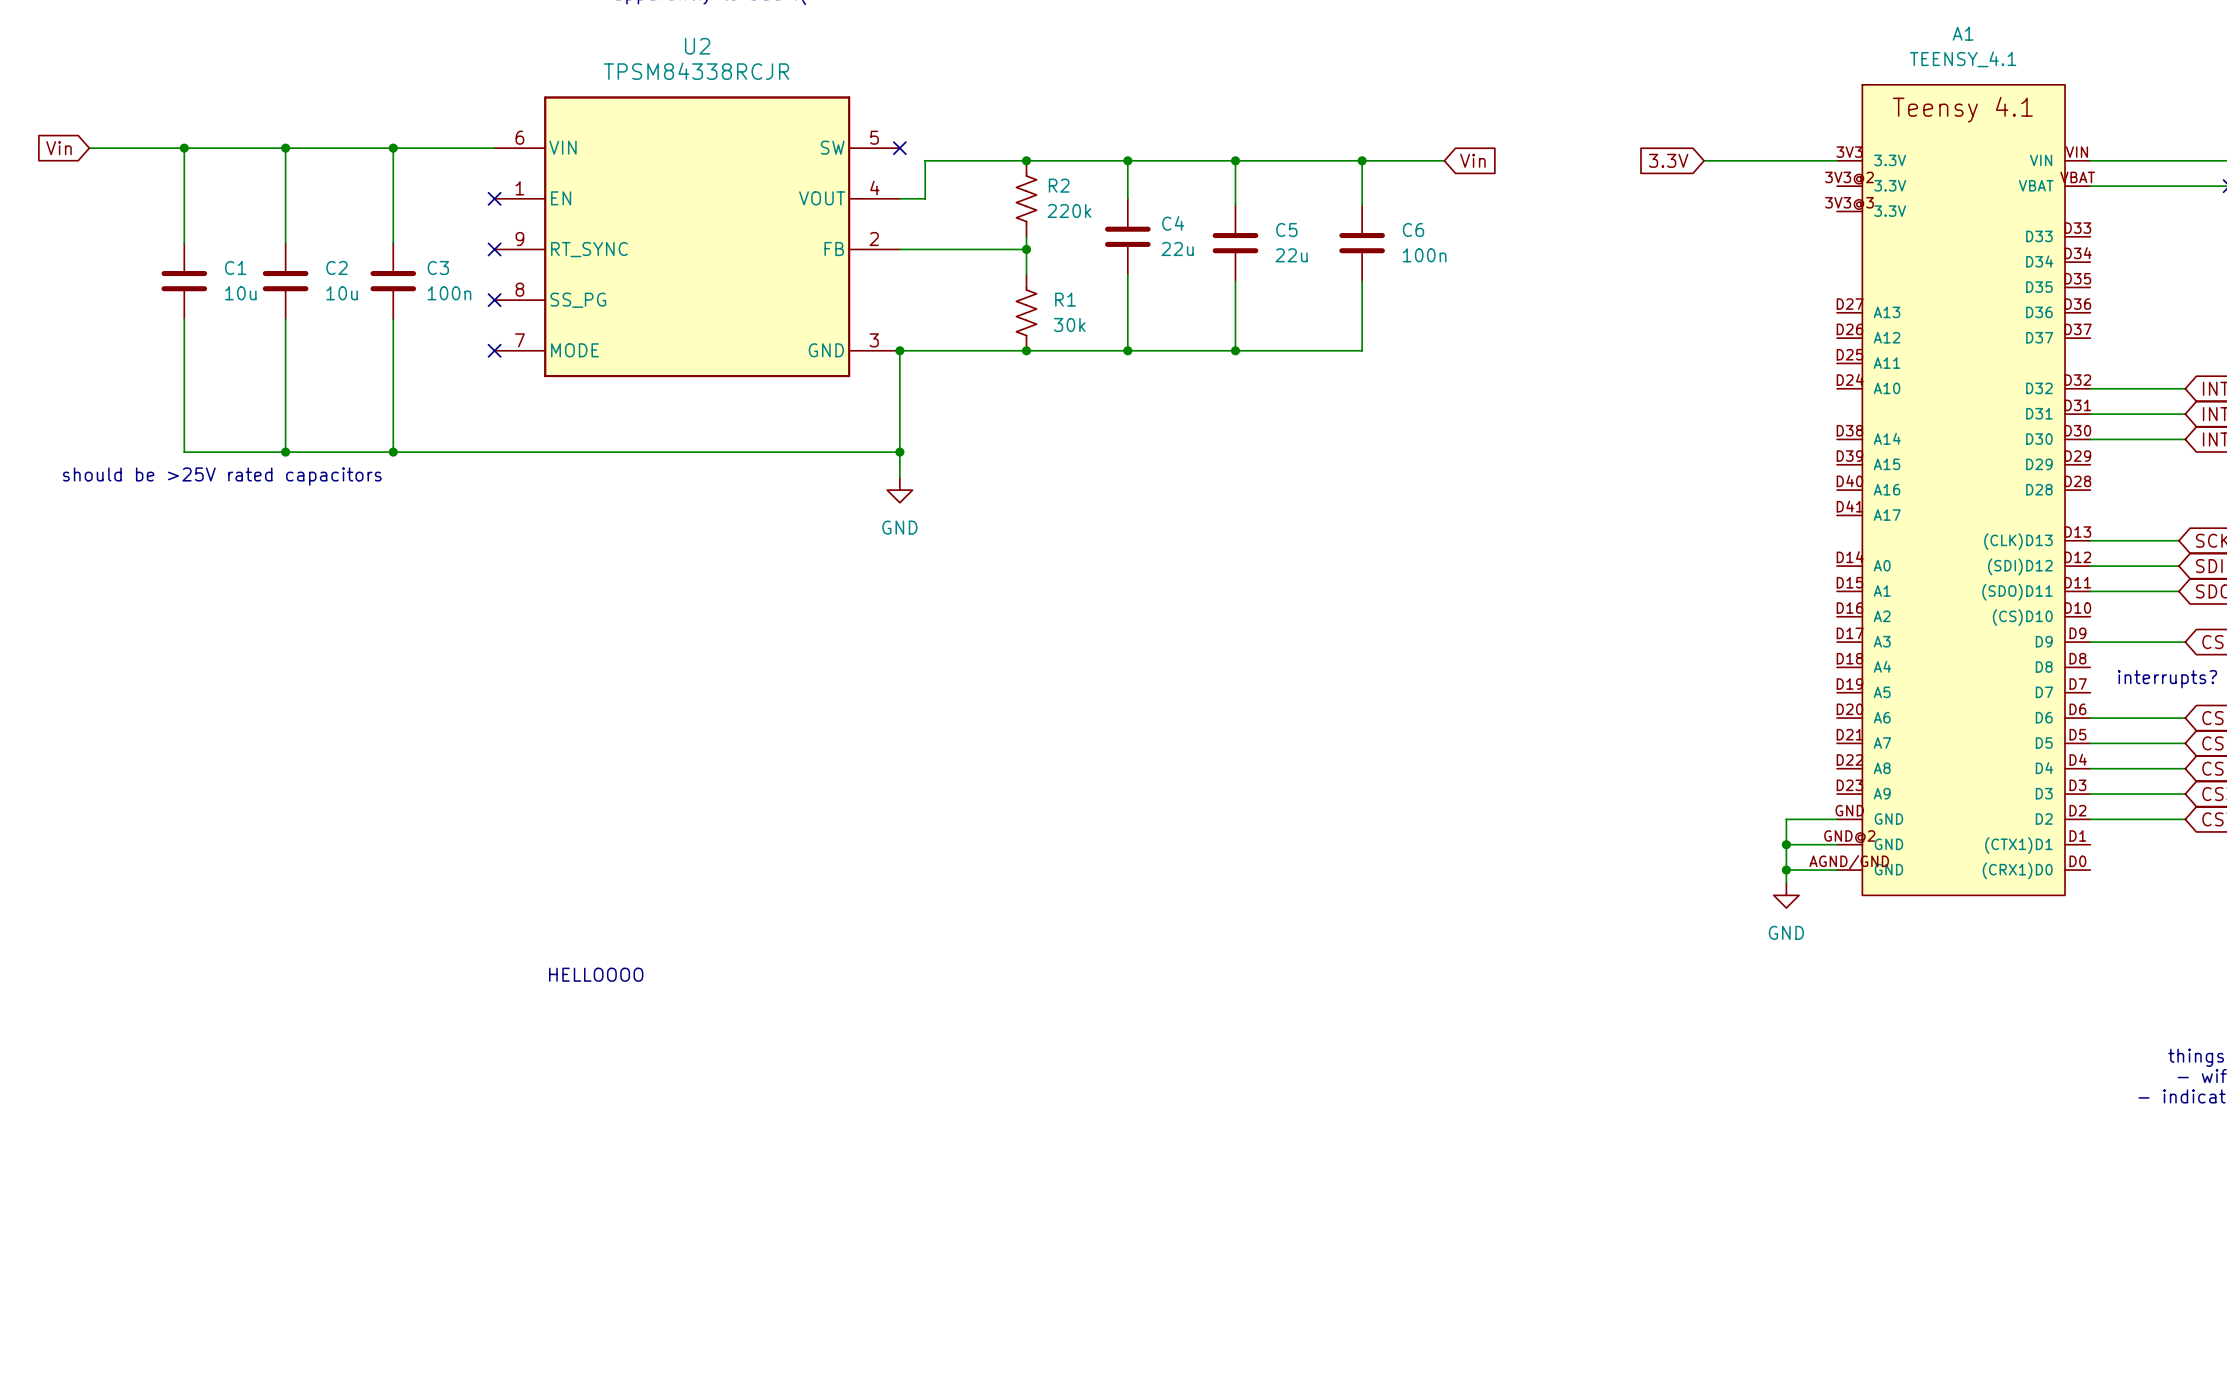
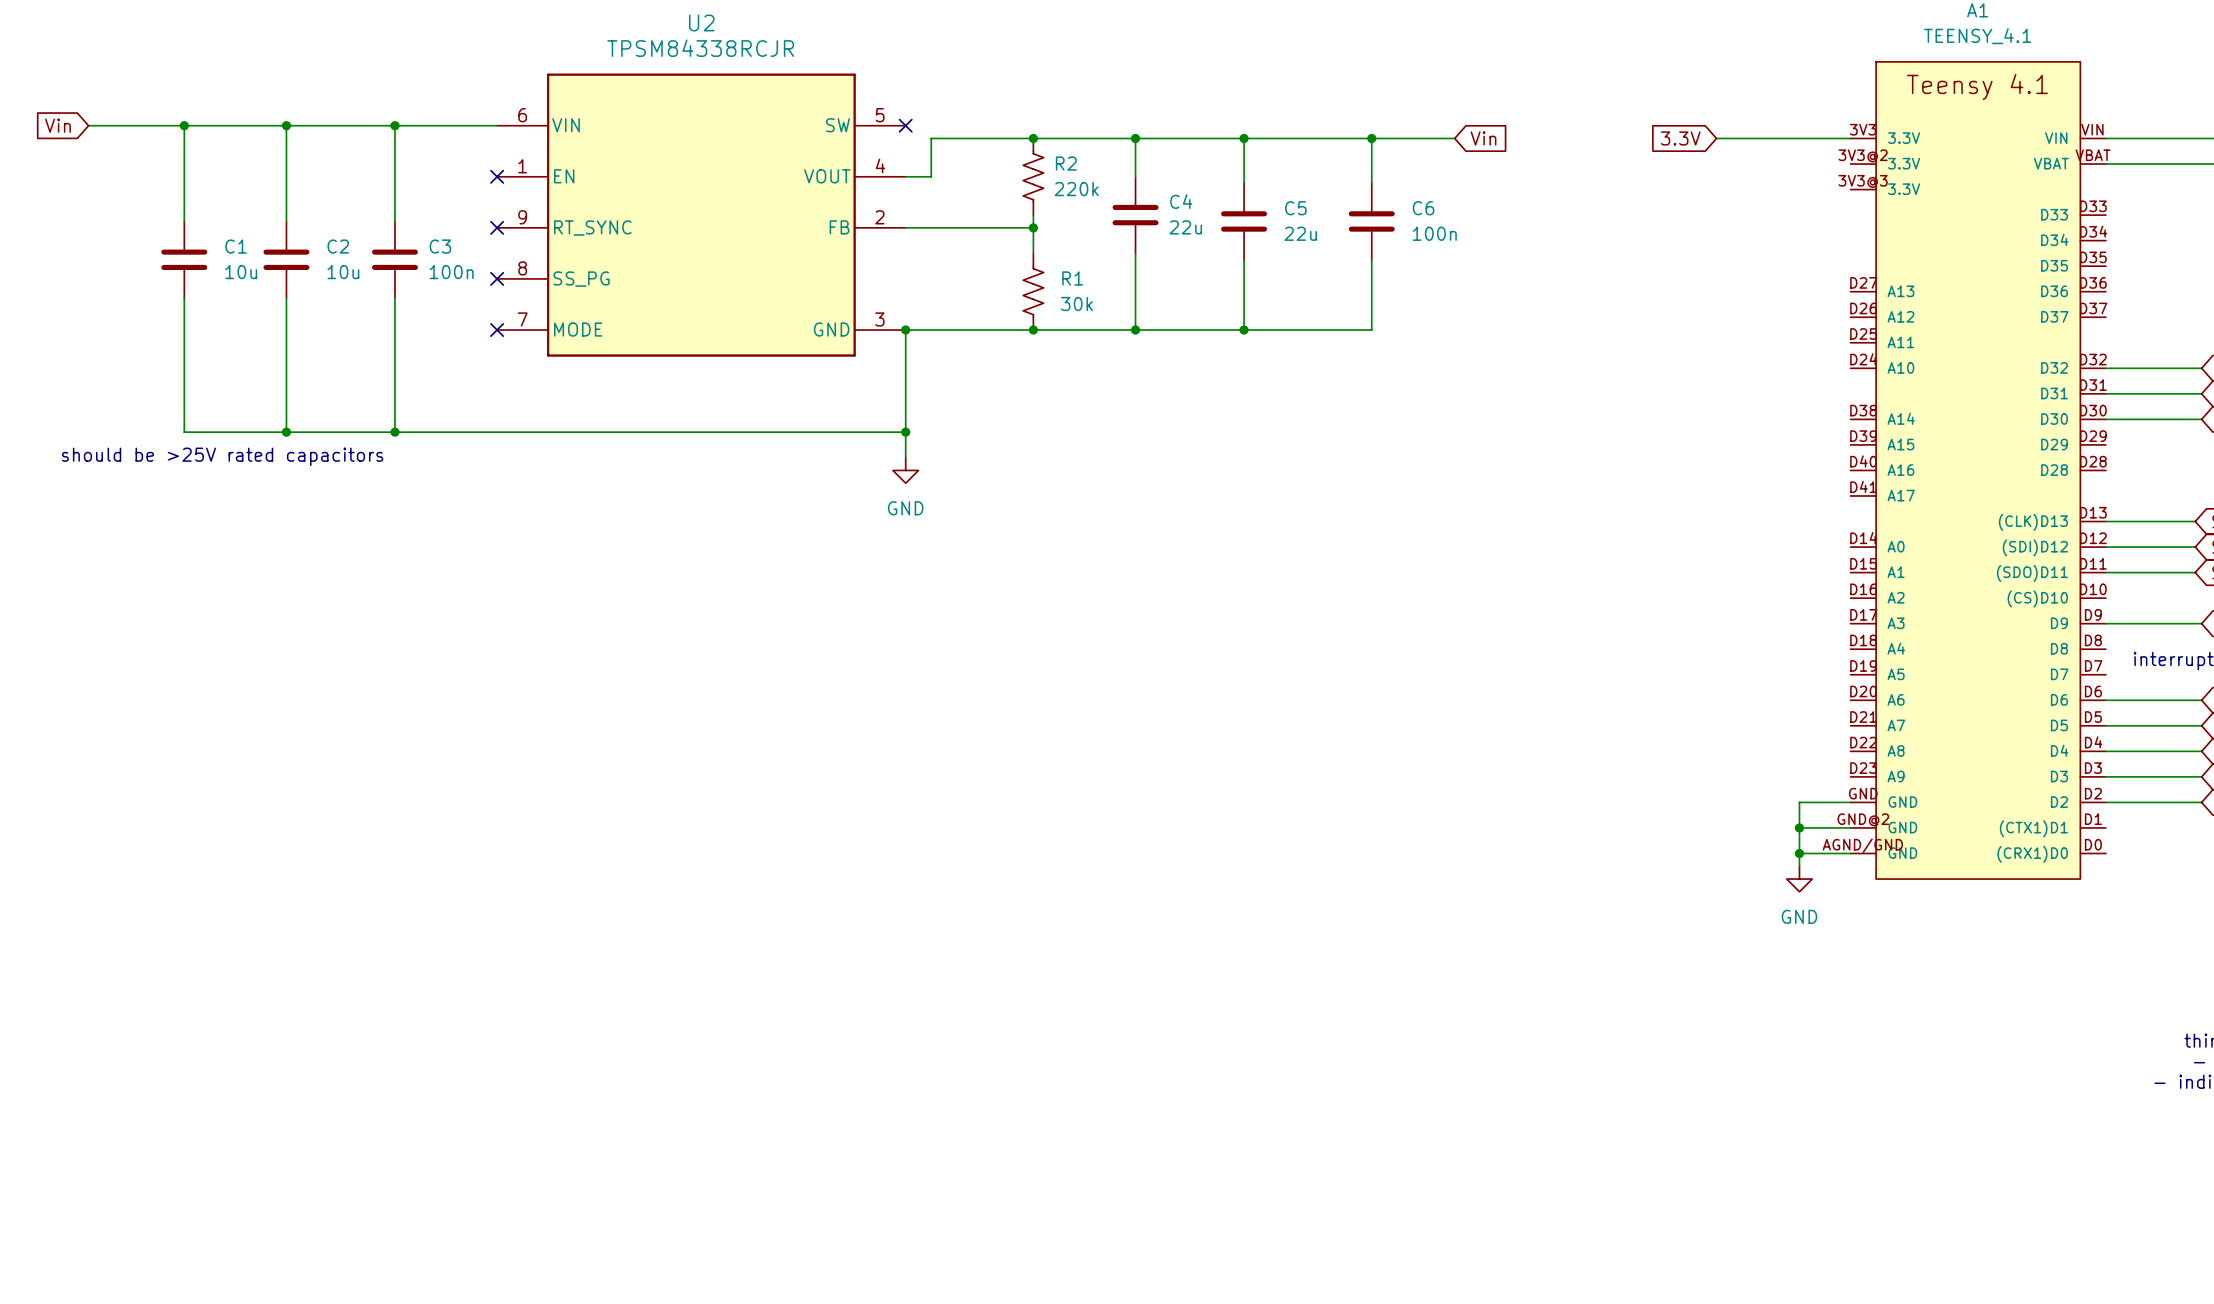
text: HELLOOOO (596, 974) -> none

